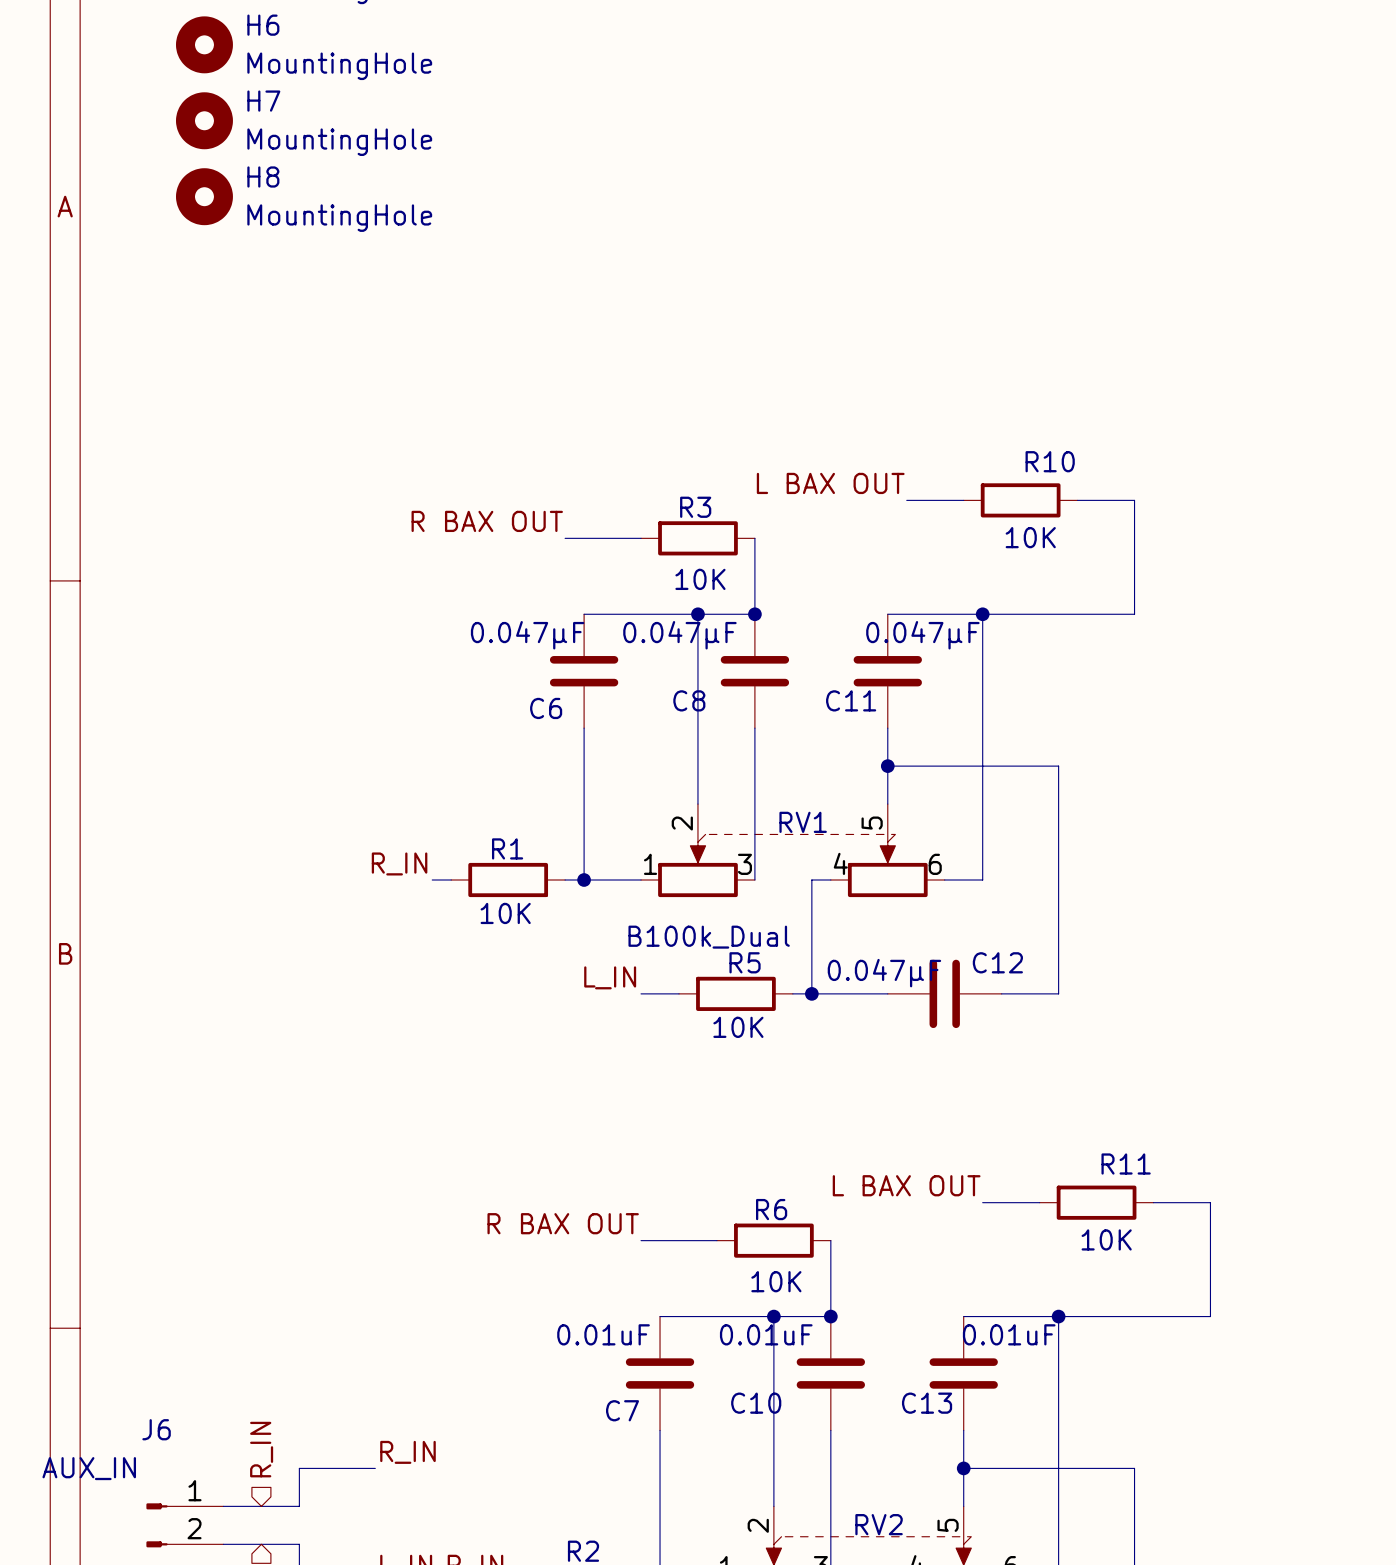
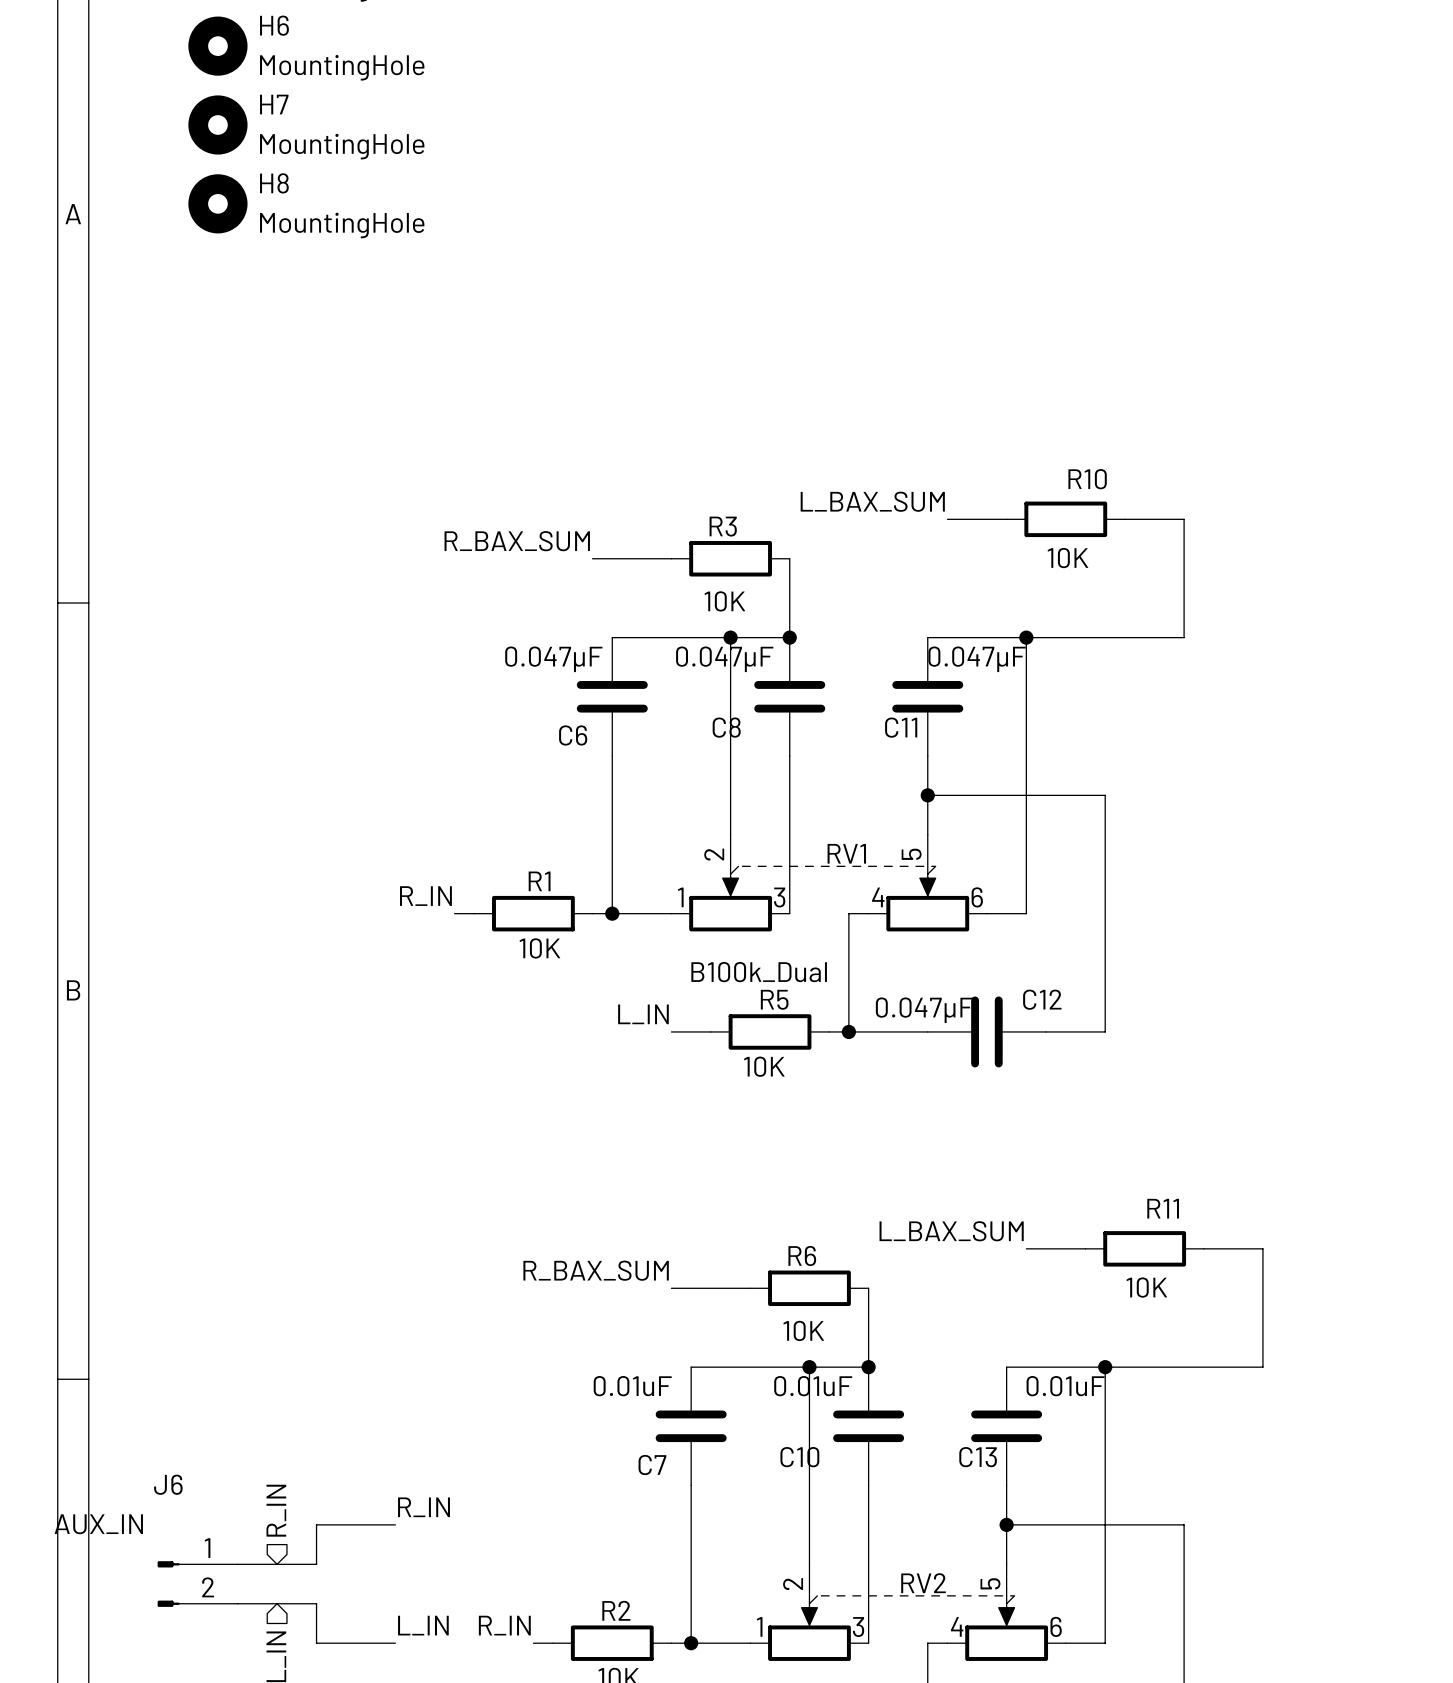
label: L BAX OUT (830, 483) -> L_BAX_SUM (872, 501)
label: R BAX OUT (487, 521) -> R_BAX_SUM (517, 541)
label: L BAX OUT (906, 1185) -> L_BAX_SUM (951, 1231)
label: R BAX OUT (563, 1223) -> R_BAX_SUM (596, 1270)

